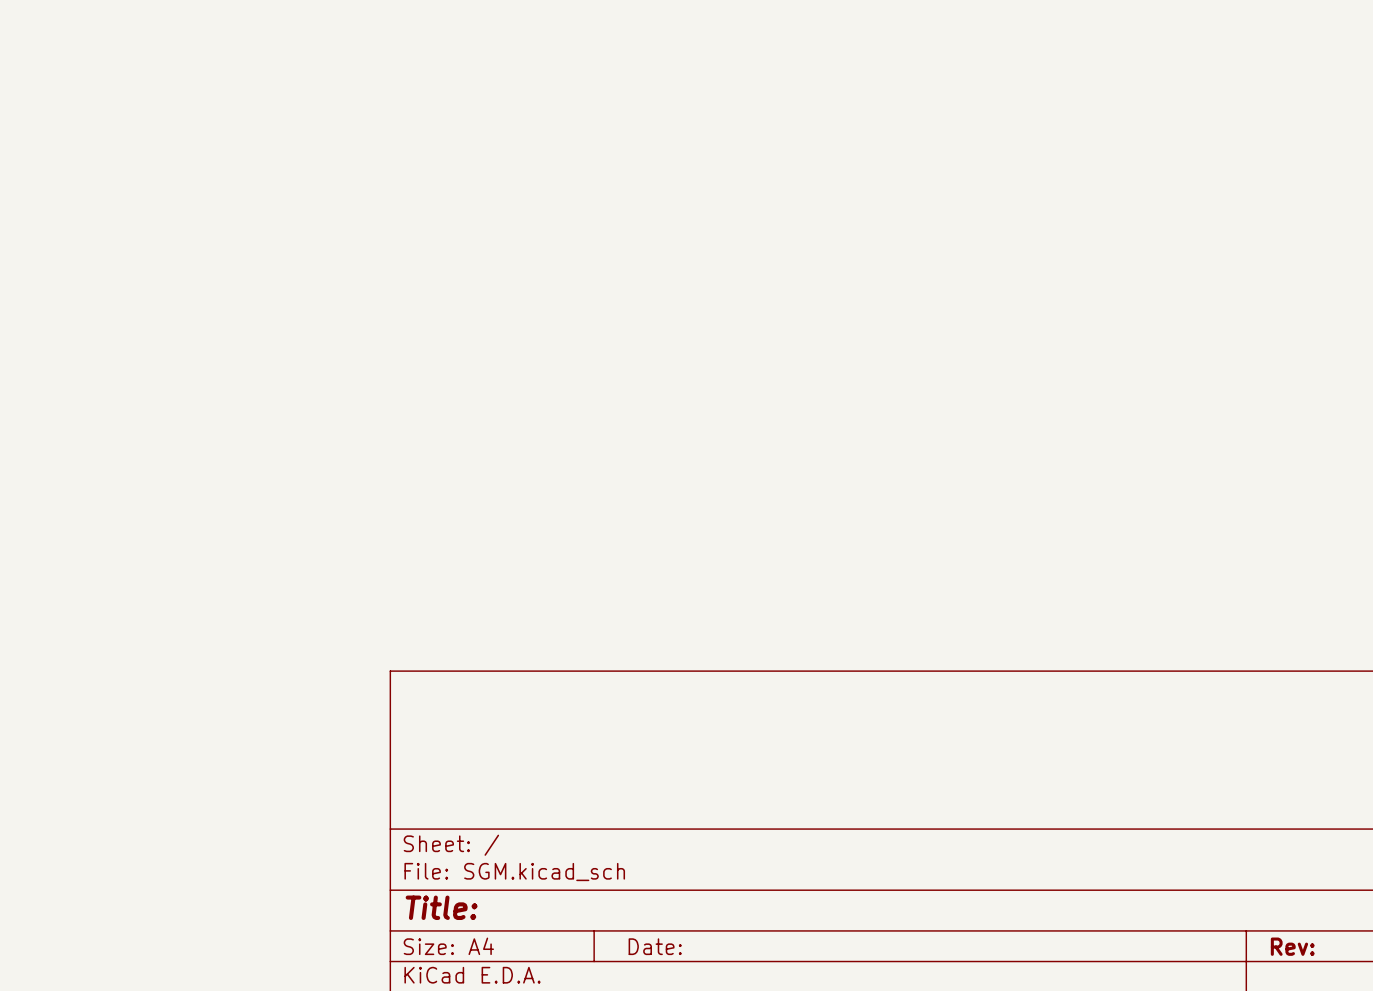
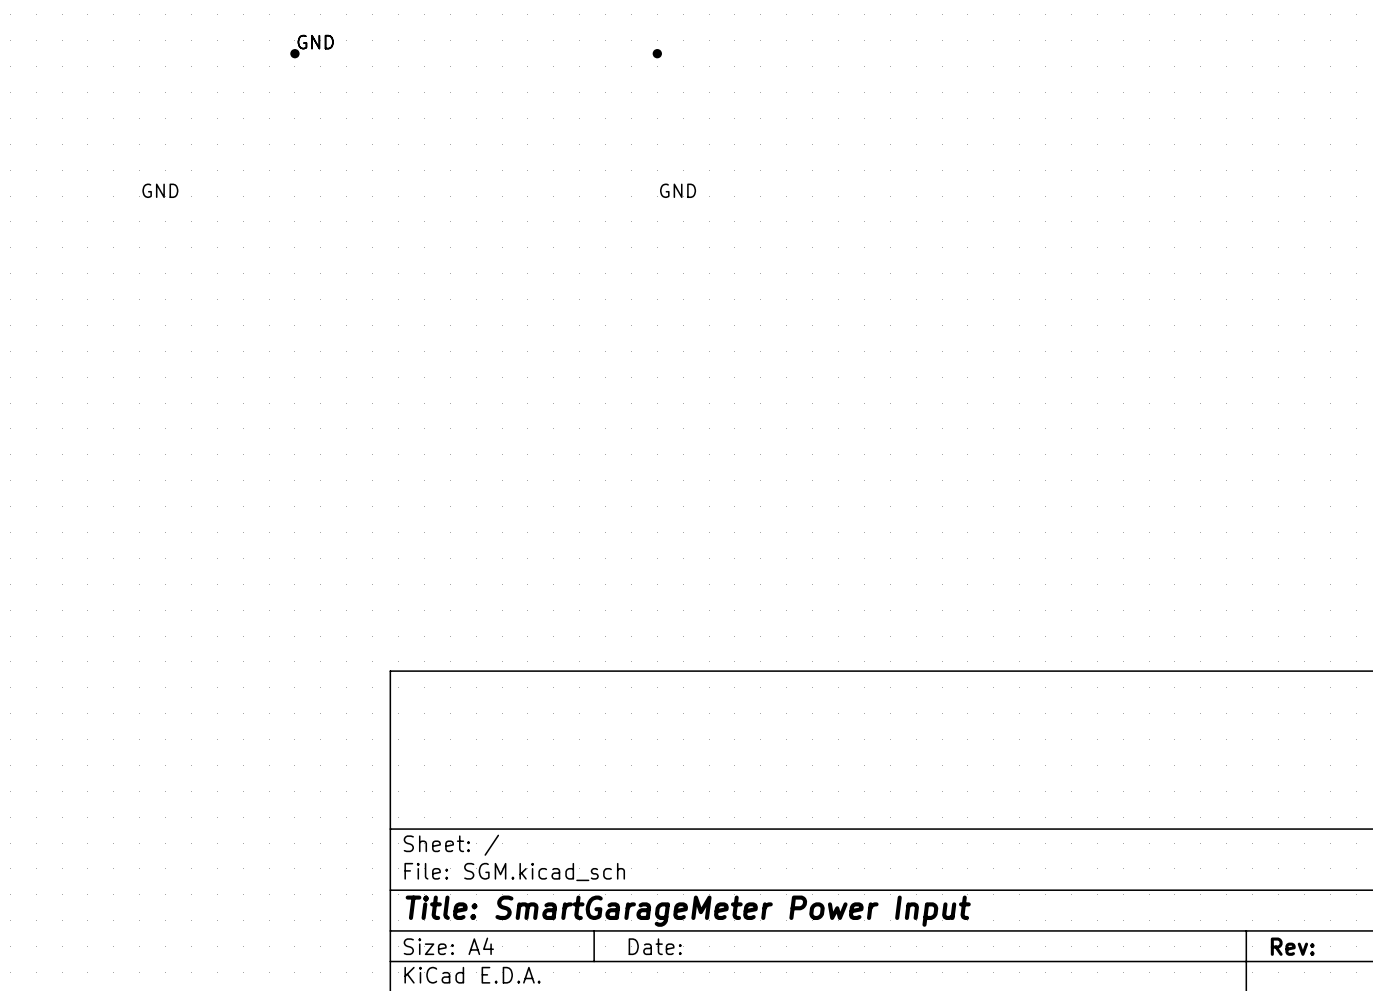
label: none -> GND (315, 42)
junction: none -> (294, 53)
junction: none -> (657, 53)
label: none -> GND (160, 190)
label: none -> GND (678, 190)
title block: Title: (441, 907) -> Title: SmartGarageMeter Power Input (688, 911)

